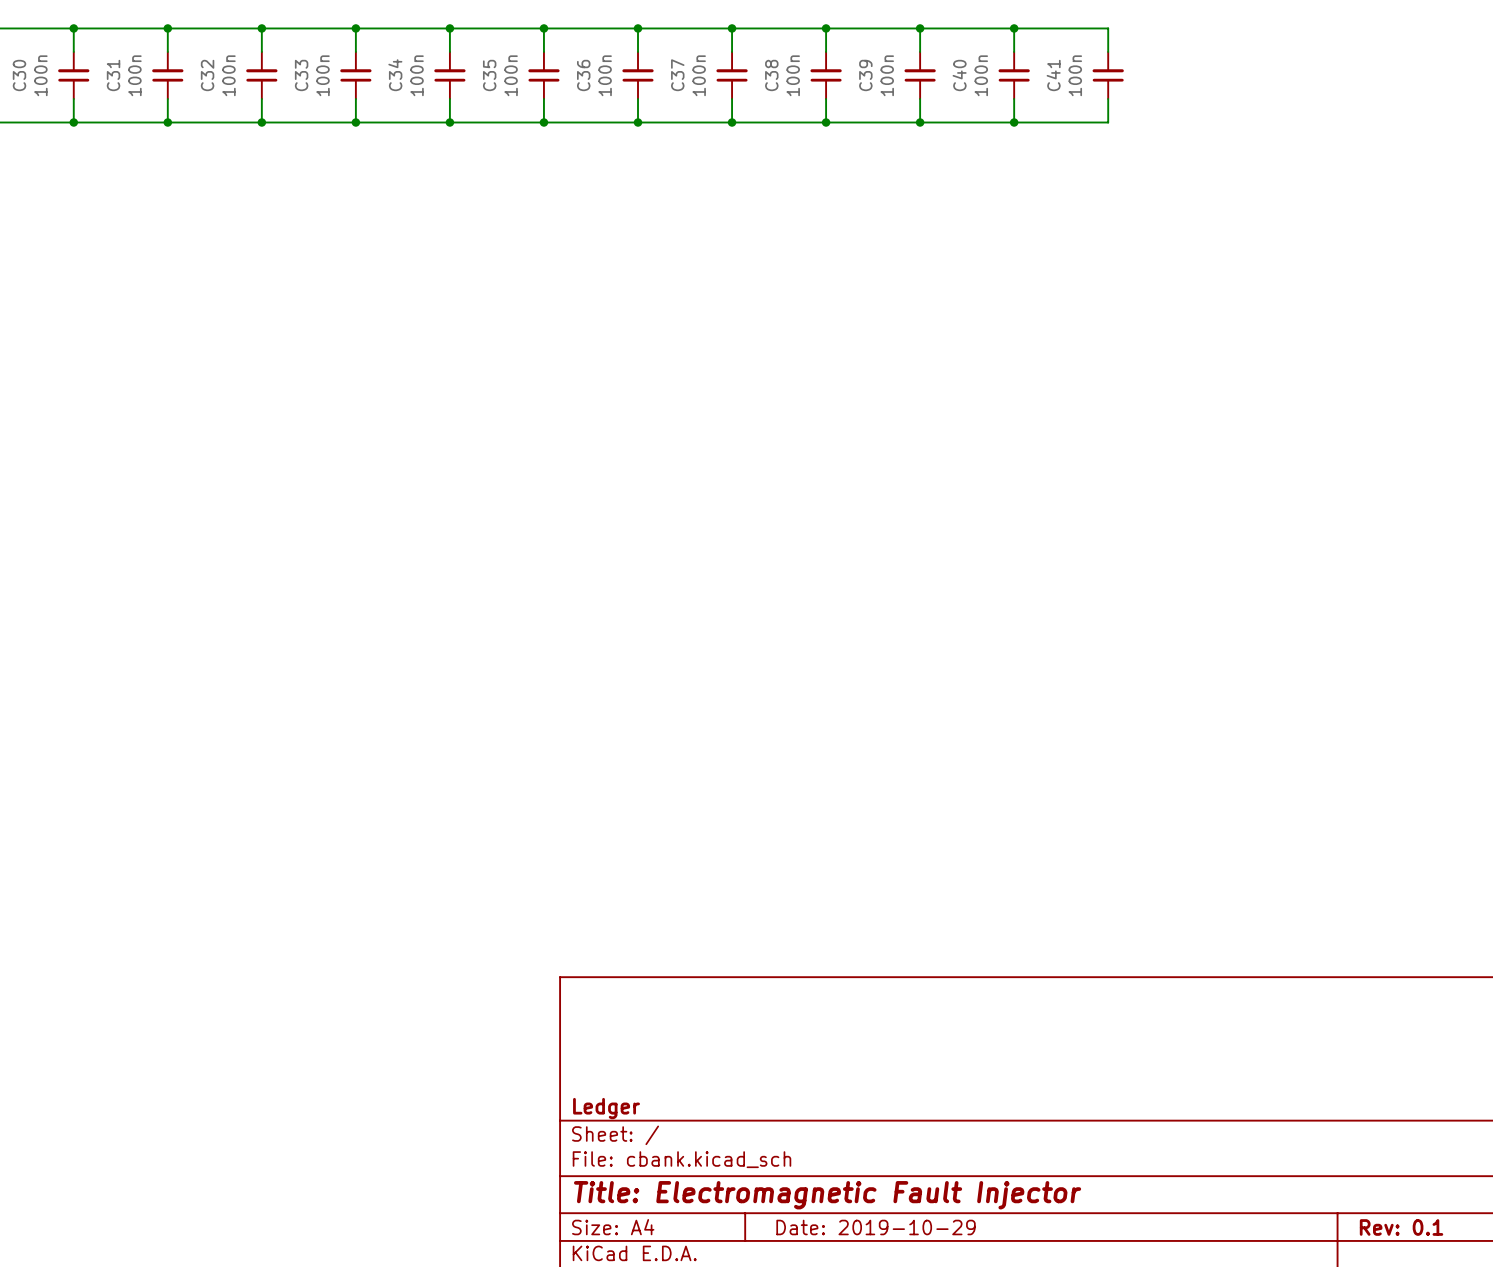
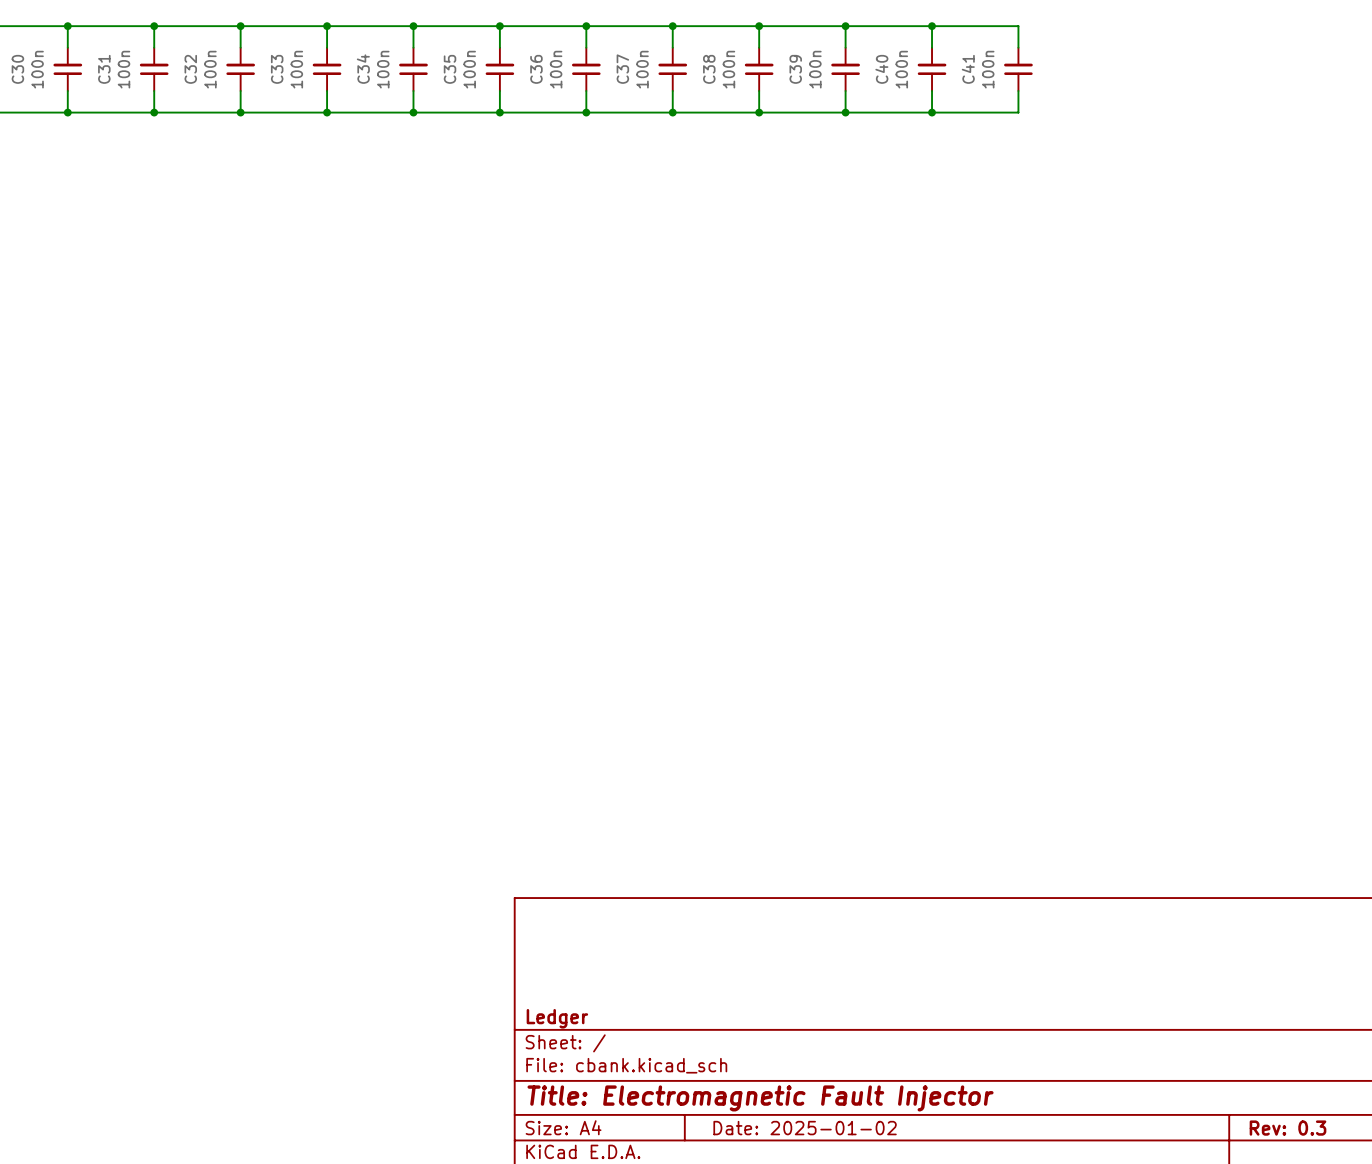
title block: Date: 2019-10-29 (876, 1227) -> Date: 2025-01-02 (805, 1128)
title block: Rev: 0.1 (1401, 1227) -> Rev: 0.3 (1288, 1128)

